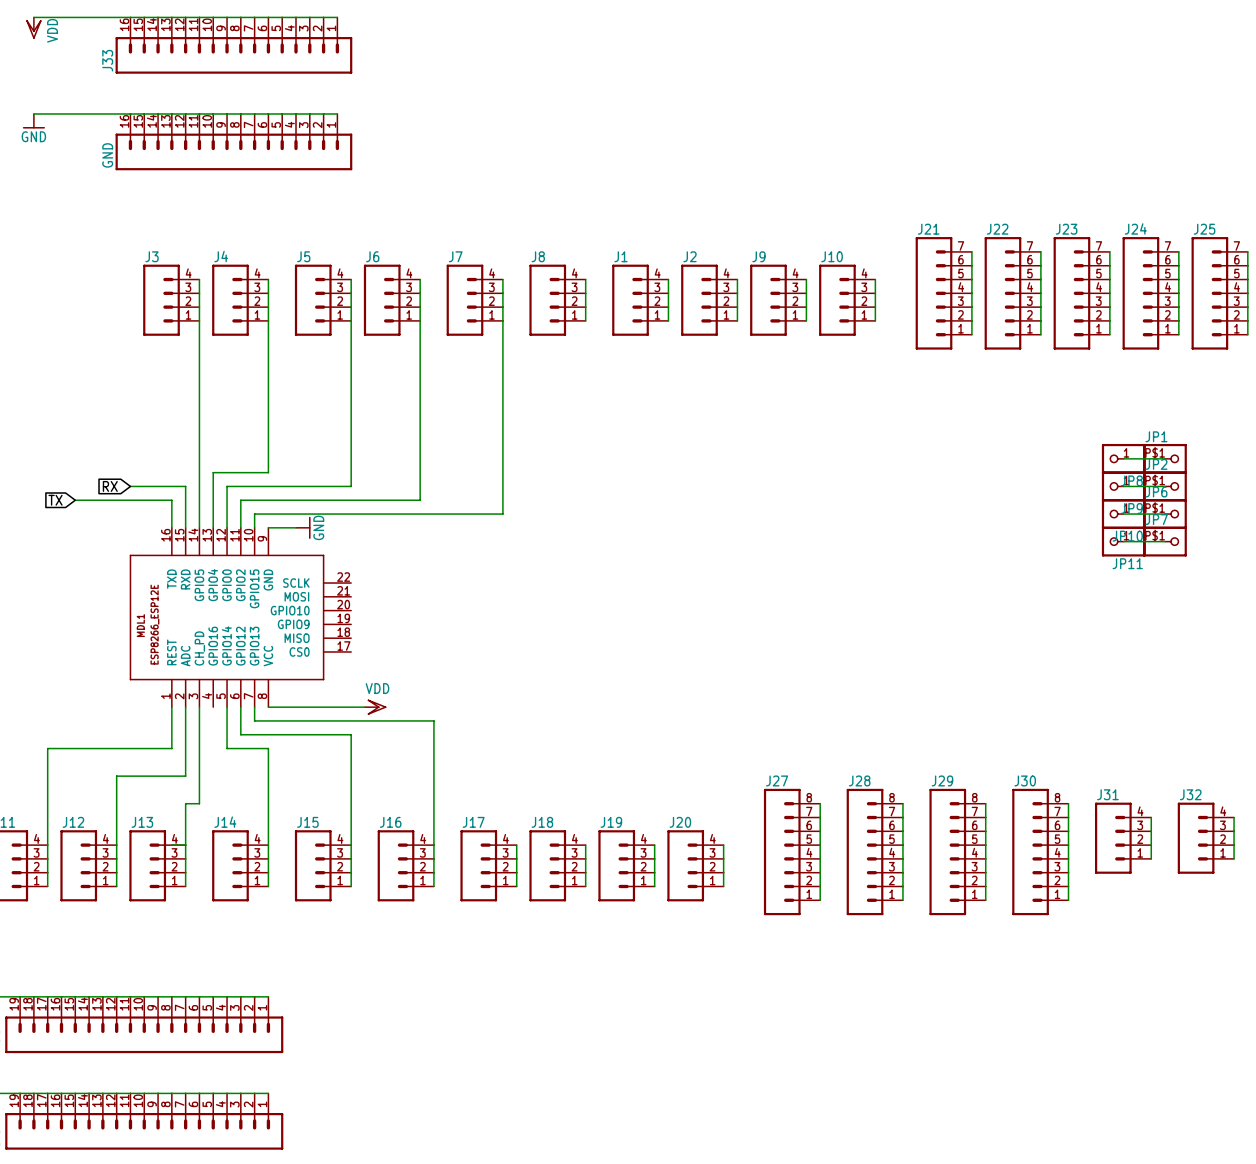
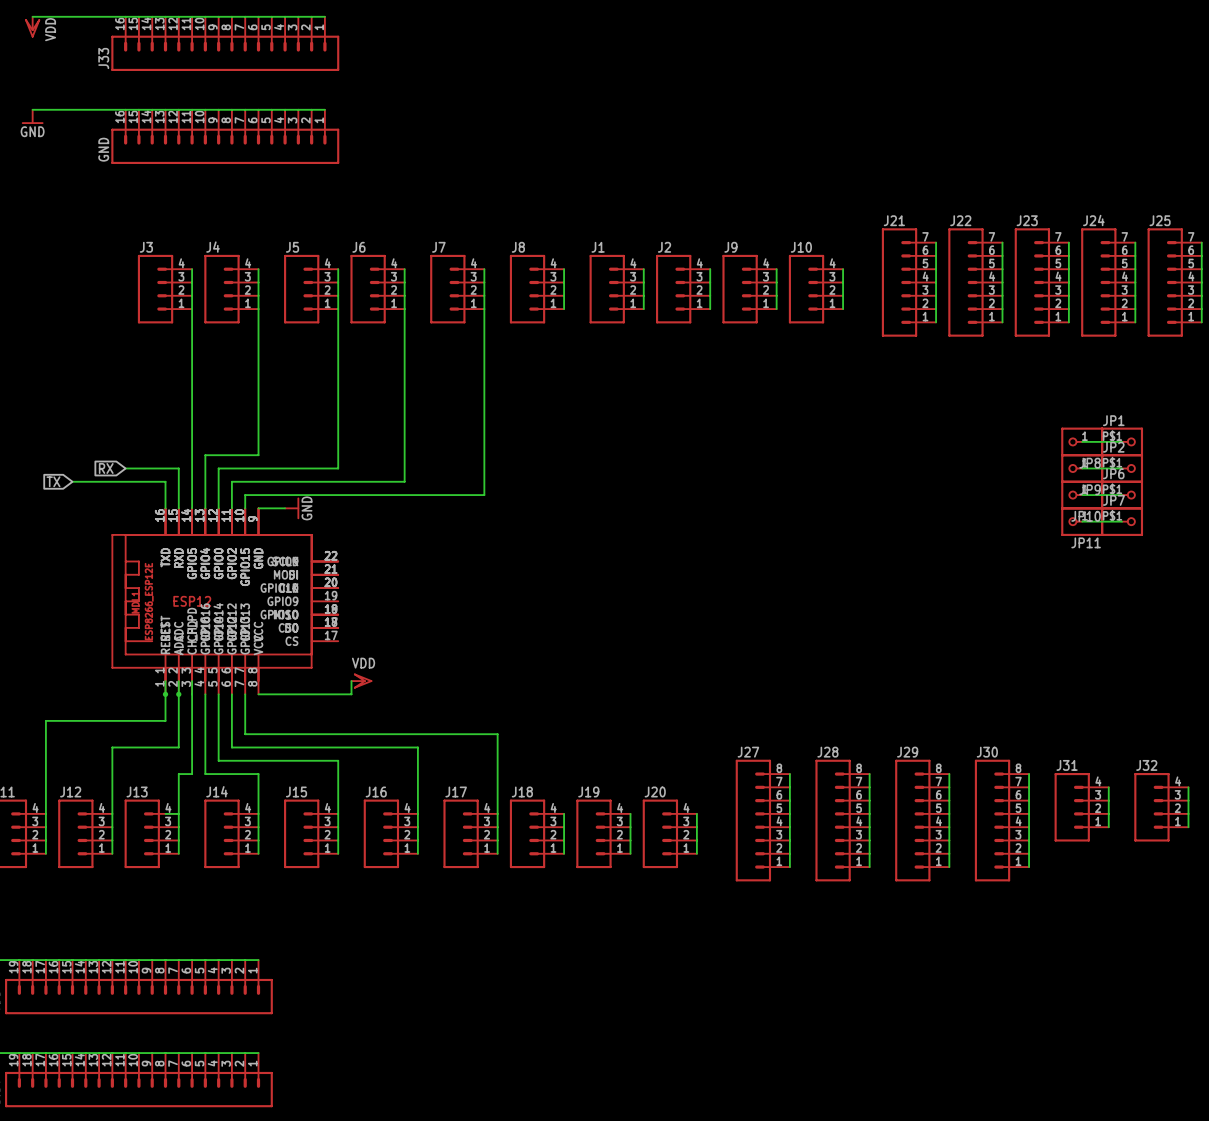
part: none -> (224, 601)
wire: (254, 707) (254, 720) (268, 720) -> none
wire: (268, 707) (364, 707) -> none
junction: none -> (165, 694)
junction: none -> (178, 694)
wire: none -> (245, 694) (245, 734) (497, 734) (497, 813)
wire: (364, 720) (433, 720) (433, 776) -> (351, 694) (351, 681)
wire: (240, 734) (351, 734) (351, 789) -> (218, 720) (218, 760) (338, 760)
wire: none -> (231, 707) (231, 747) (417, 747)
wire: (227, 748) (268, 748) (268, 803) -> (205, 694) (205, 774) (258, 774)

